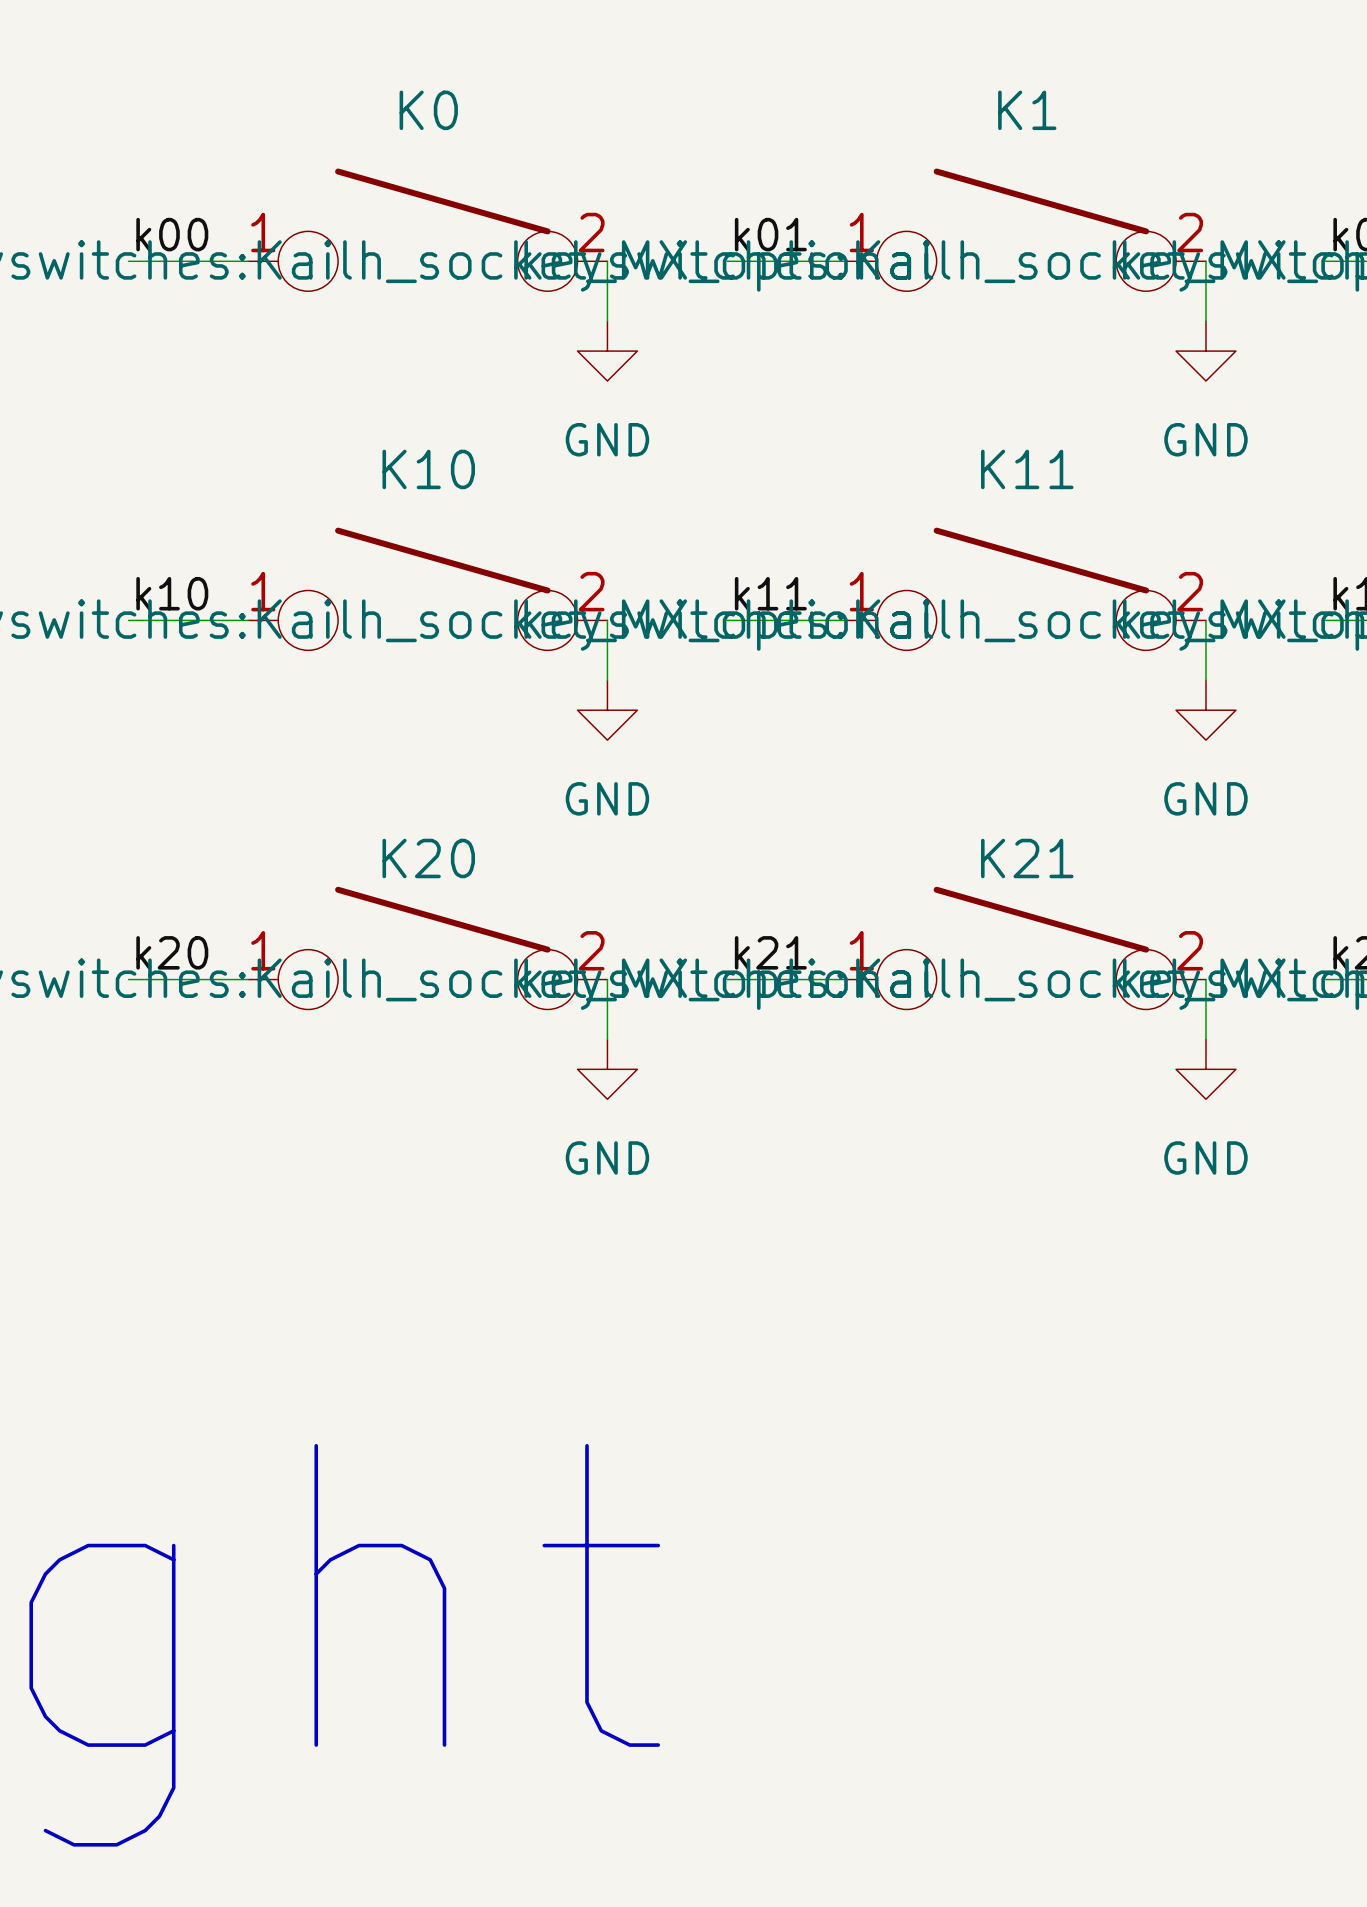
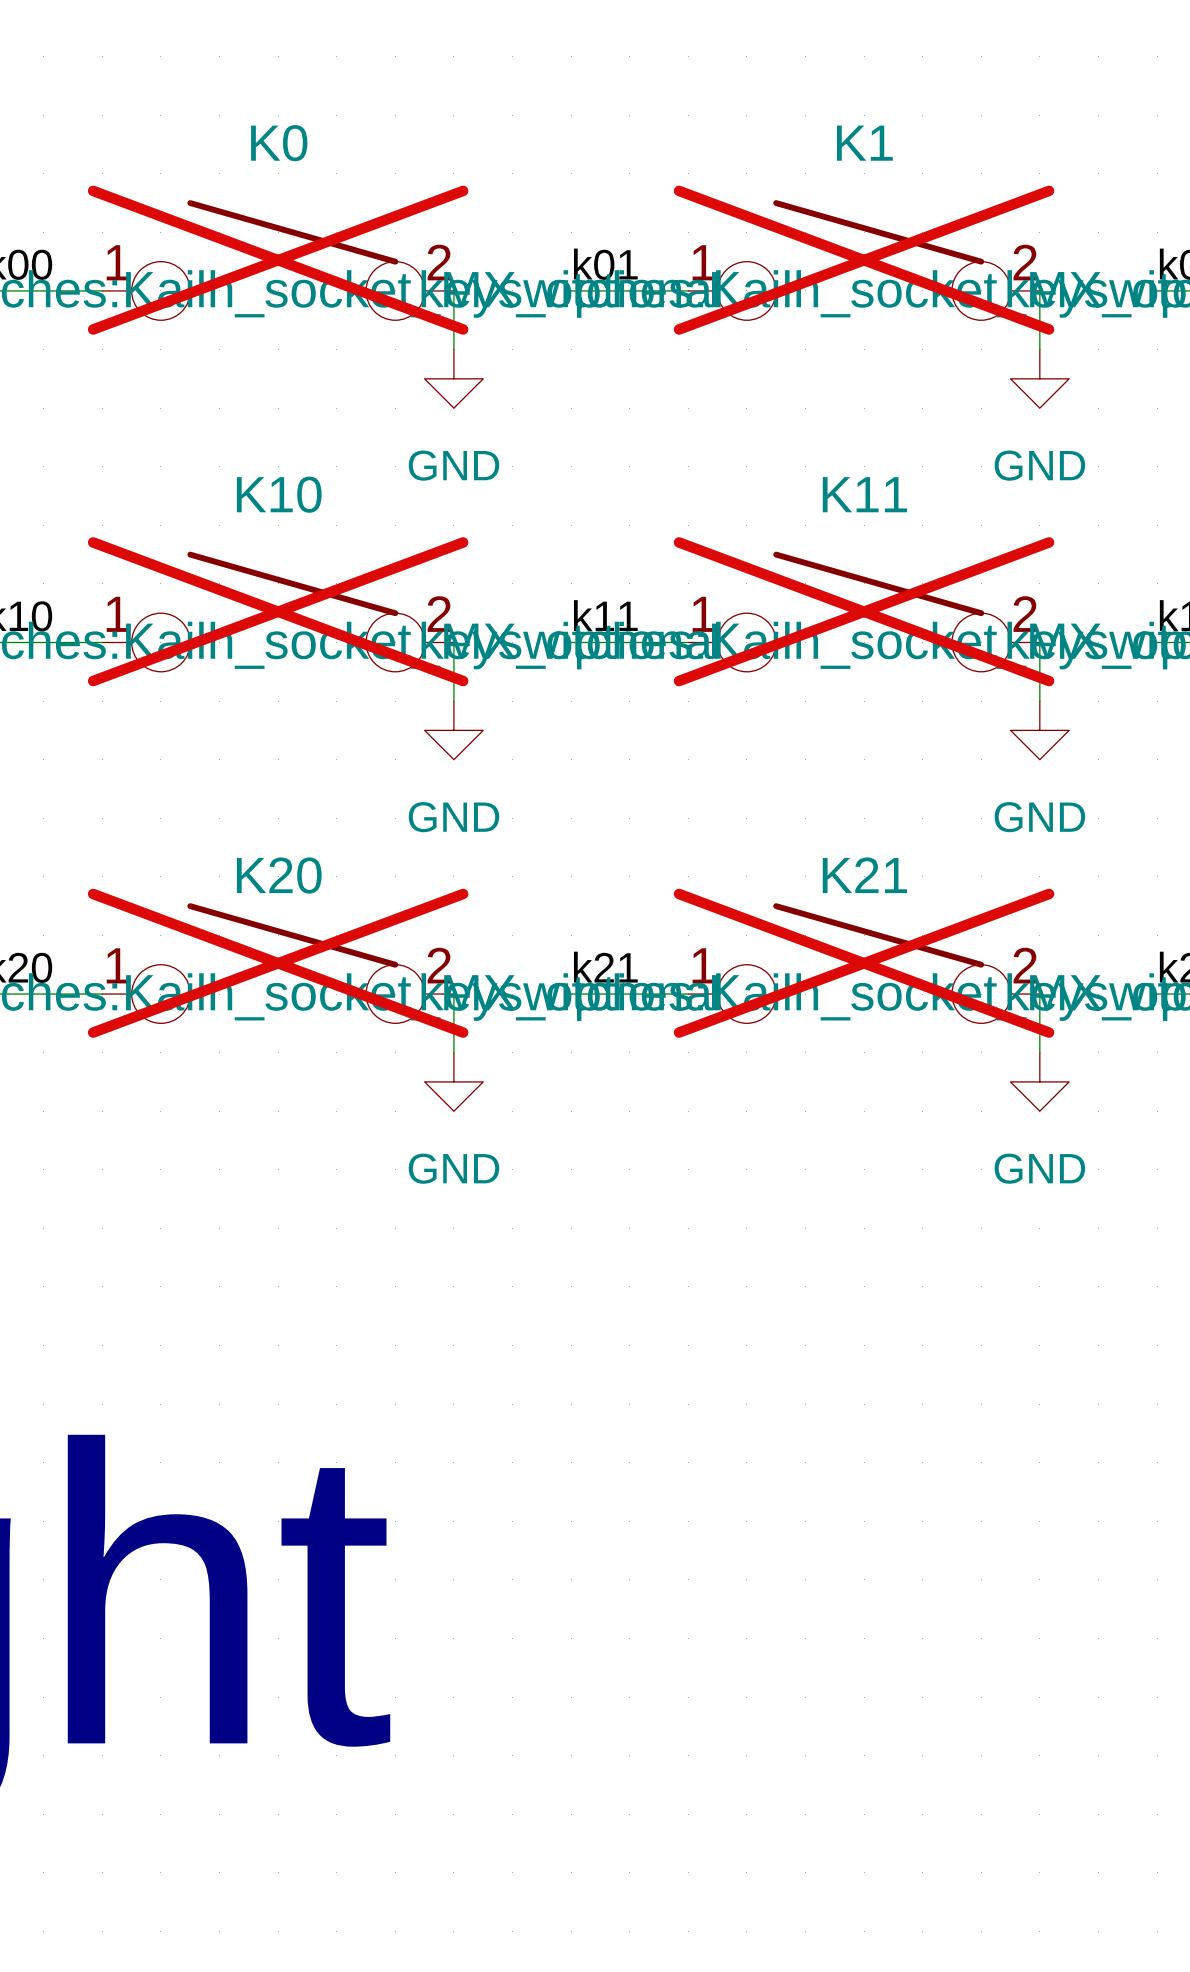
K0 do-not-place cross: none -> (278, 260)
K1 do-not-place cross: none -> (864, 260)
K10 do-not-place cross: none -> (278, 611)
K11 do-not-place cross: none -> (864, 611)
K20 do-not-place cross: none -> (278, 963)
K21 do-not-place cross: none -> (864, 963)

